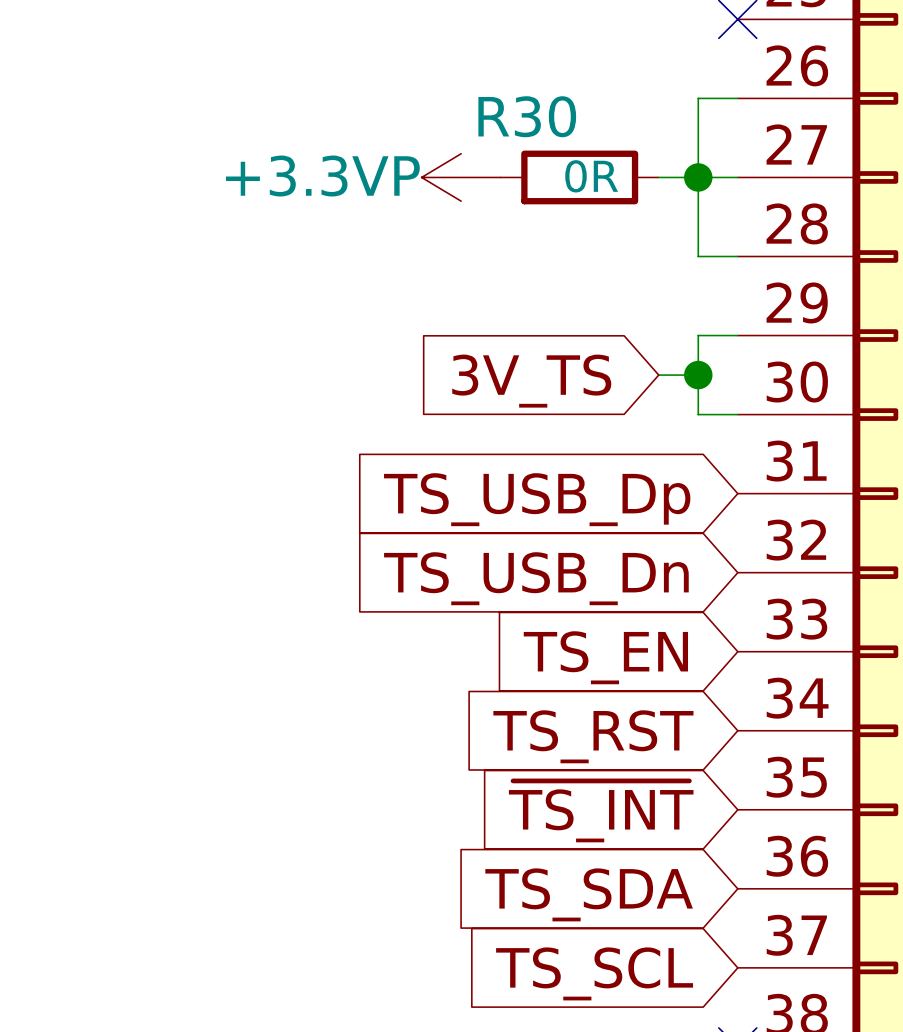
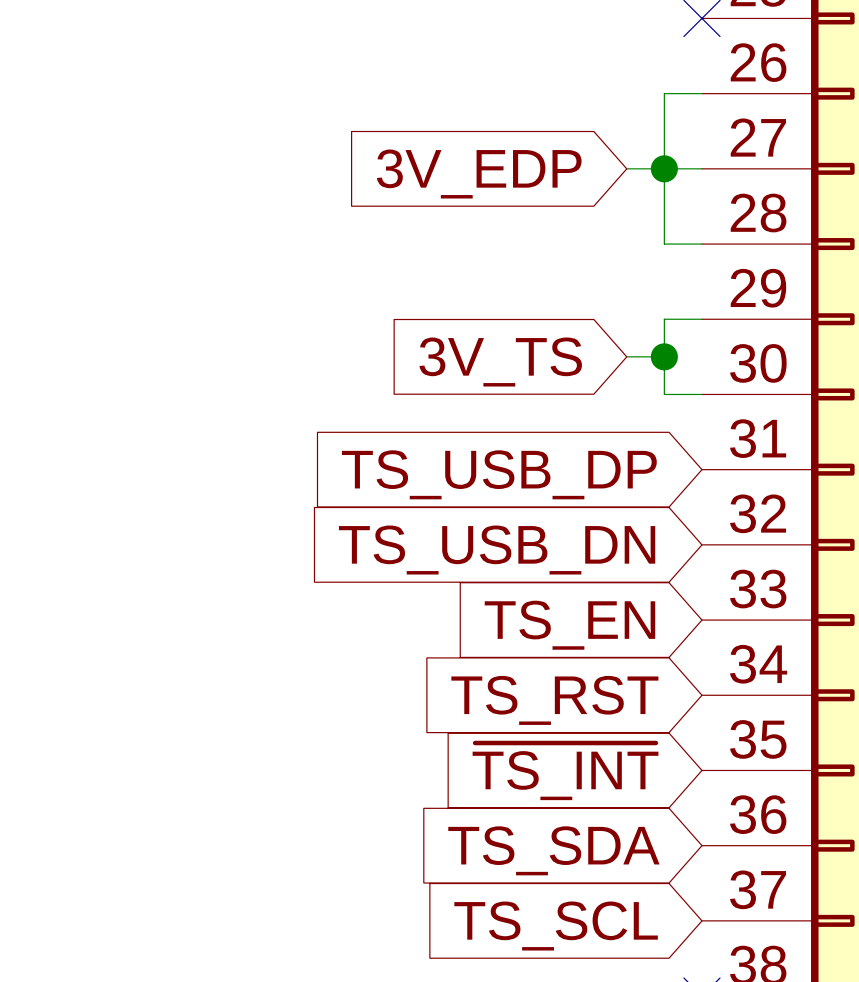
power symbol: +3.3VP (461, 177) -> none
R30: 0R (579, 177) -> none
global label: none -> 3V_EDP (479, 174)
global label: TS_USB_Dp (537, 499) -> TS_USB_DP (499, 474)
global label: TS_USB_Dn (536, 578) -> TS_USB_DN (497, 550)

